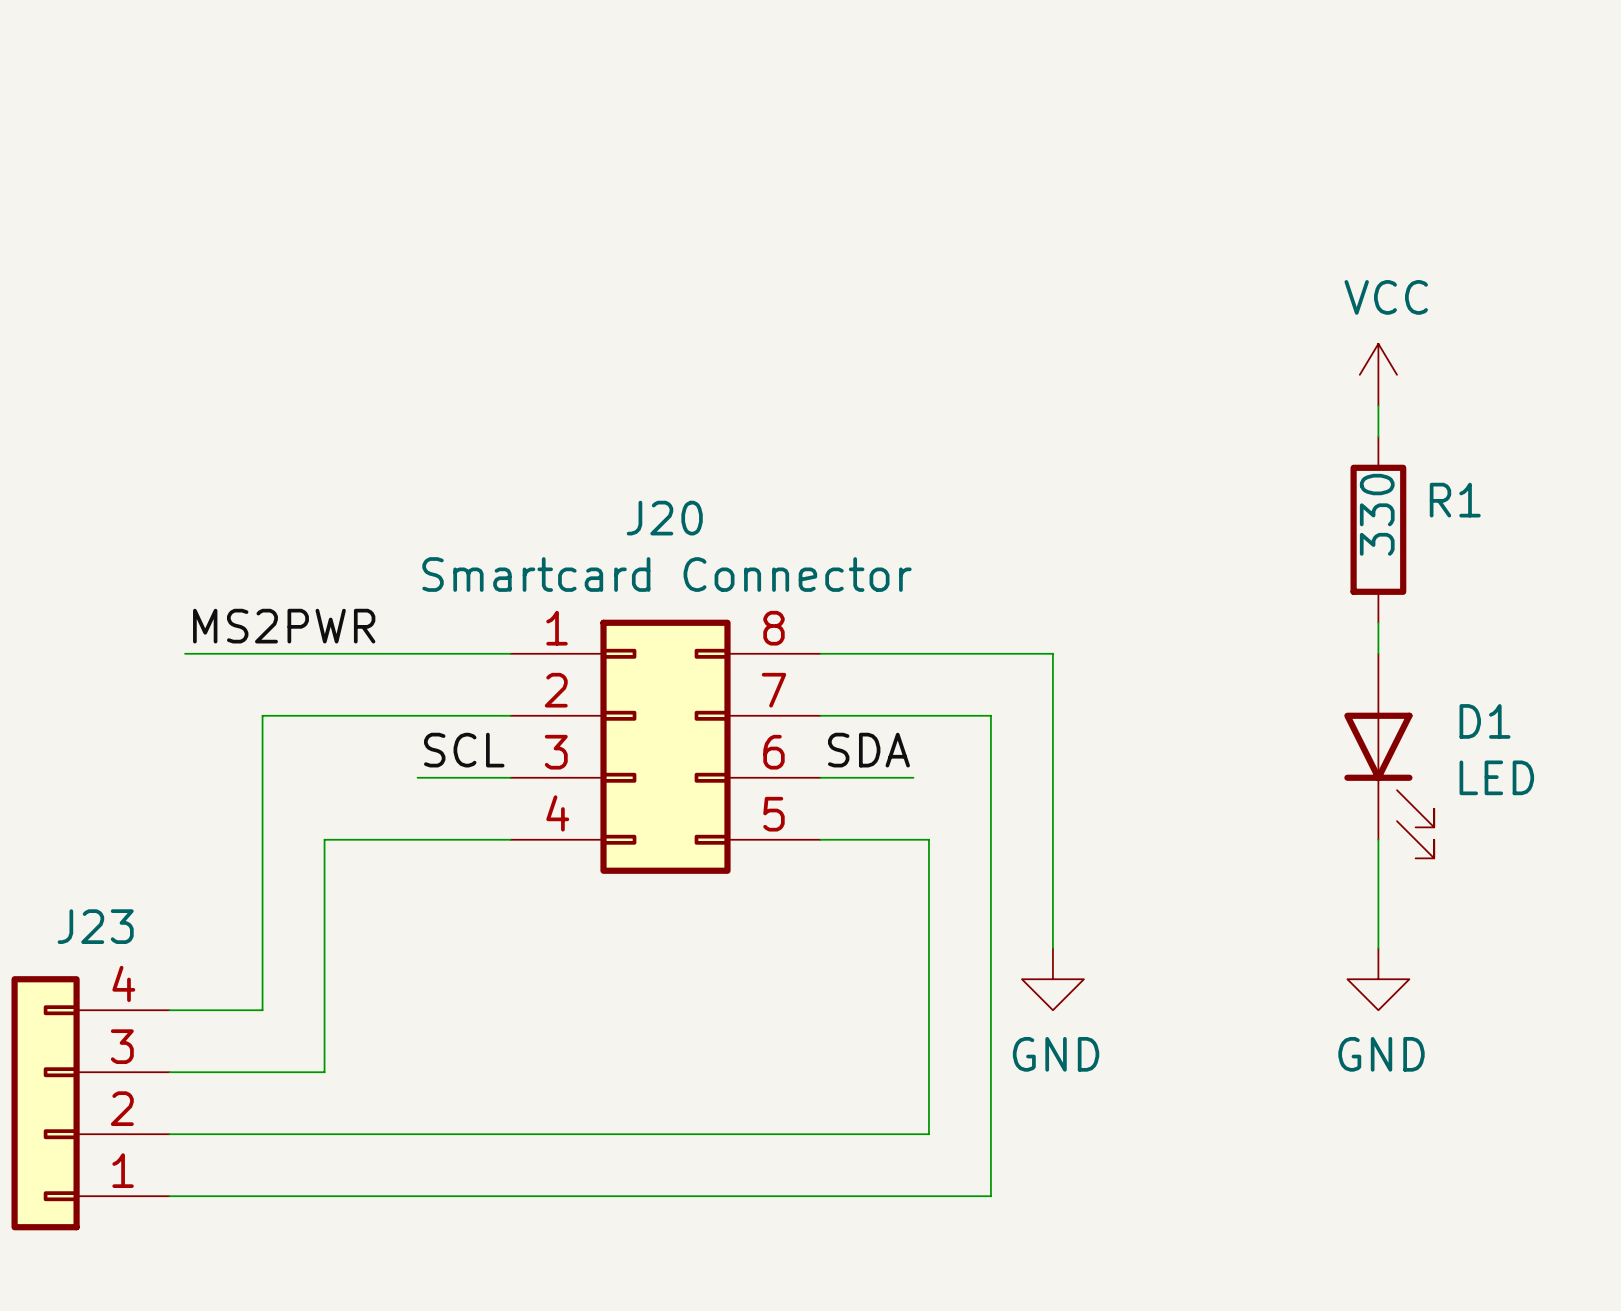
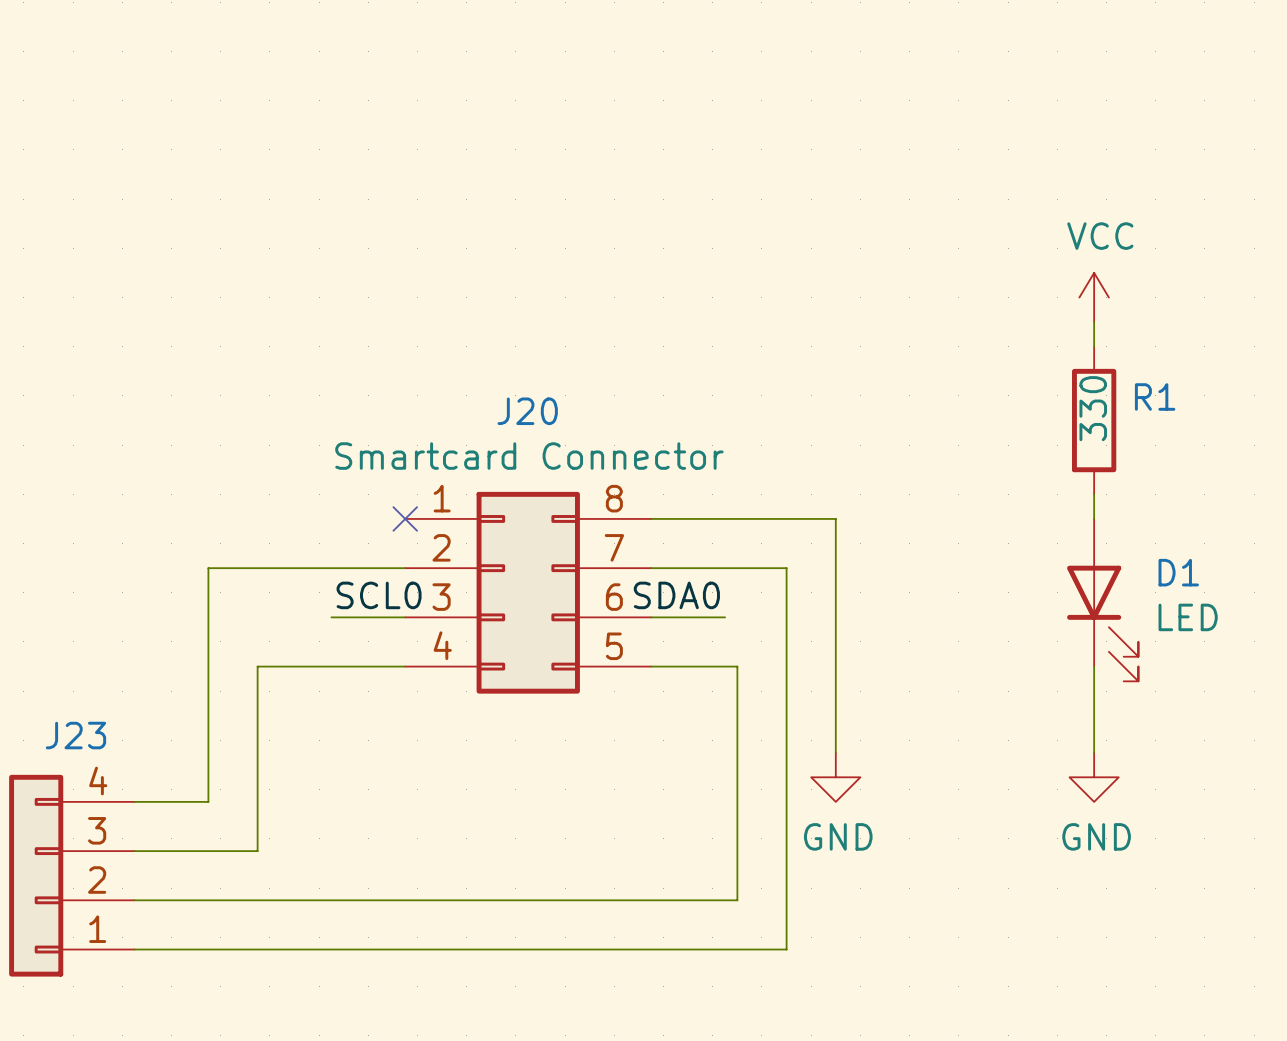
label: MS2PWR (284, 626) -> none
wire: (185, 653) (510, 653) -> none
no-connect mark: none -> (405, 518)
label: SCL (464, 750) -> SCL0 (379, 595)
label: SDA (868, 750) -> SDA0 (676, 595)

